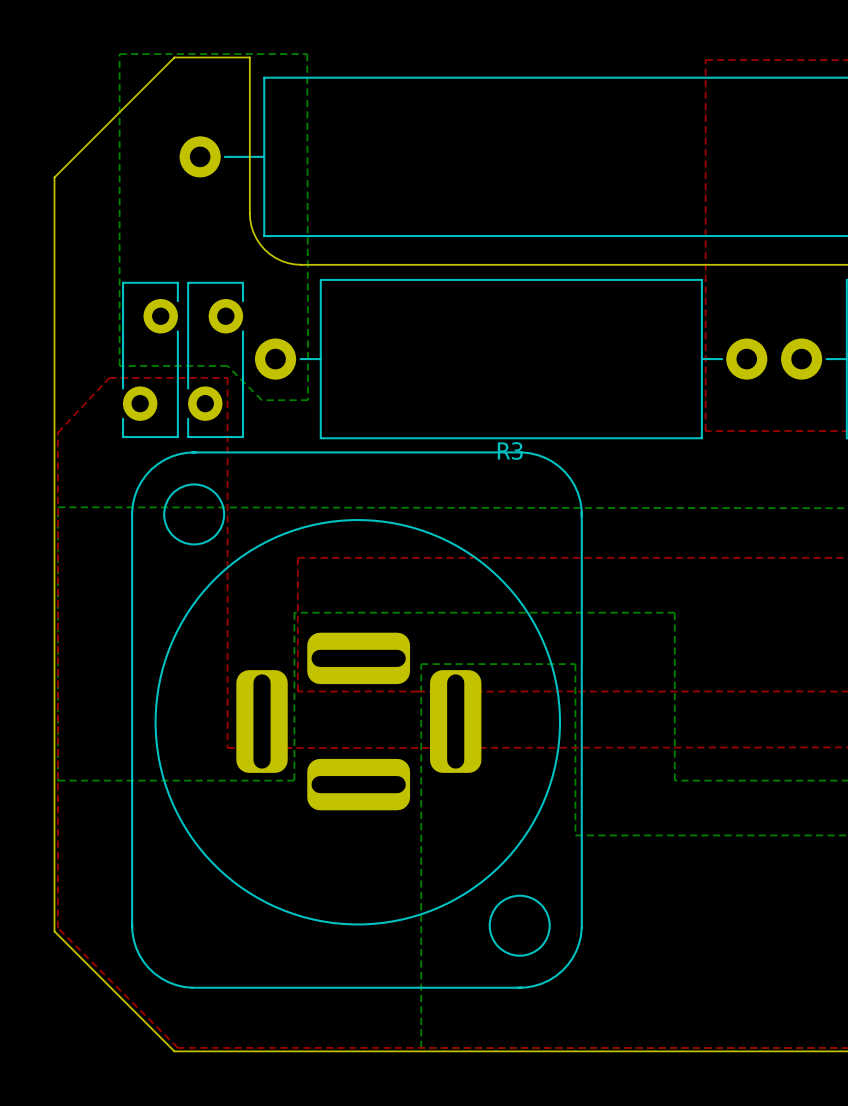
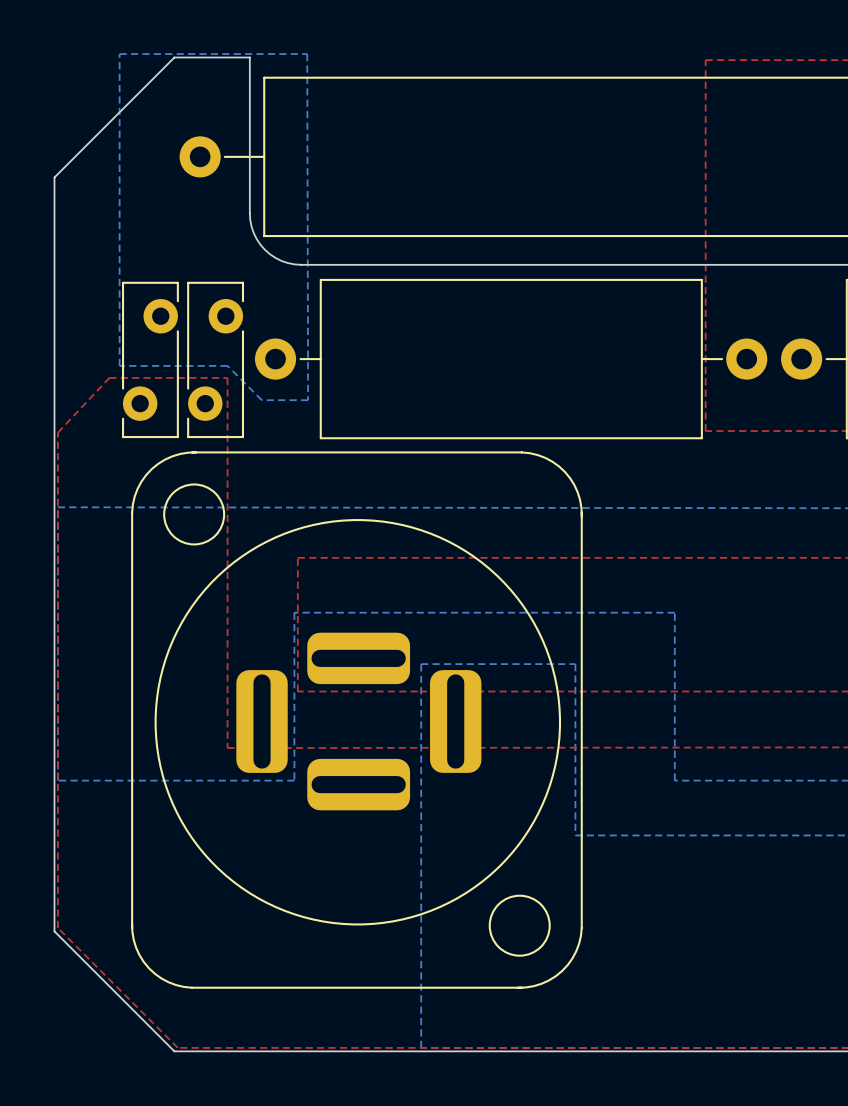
R3 name: R3 (510, 450) -> none

